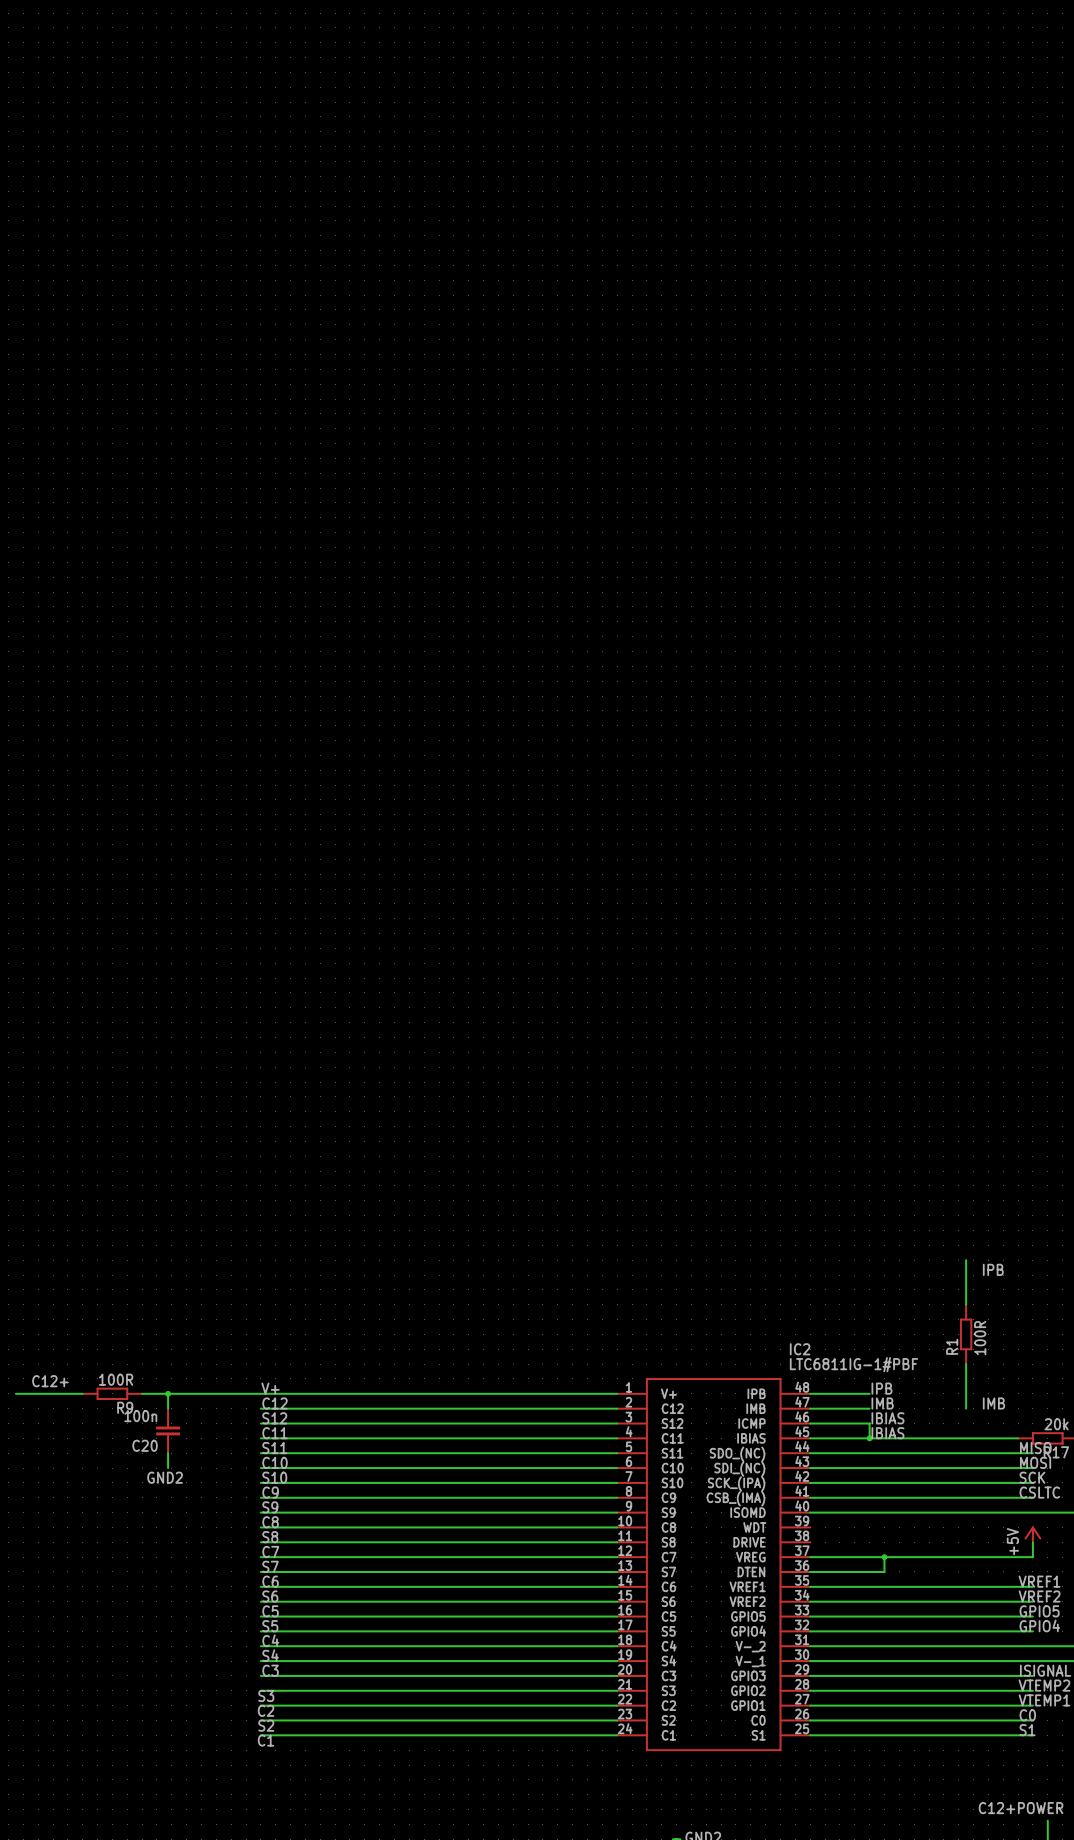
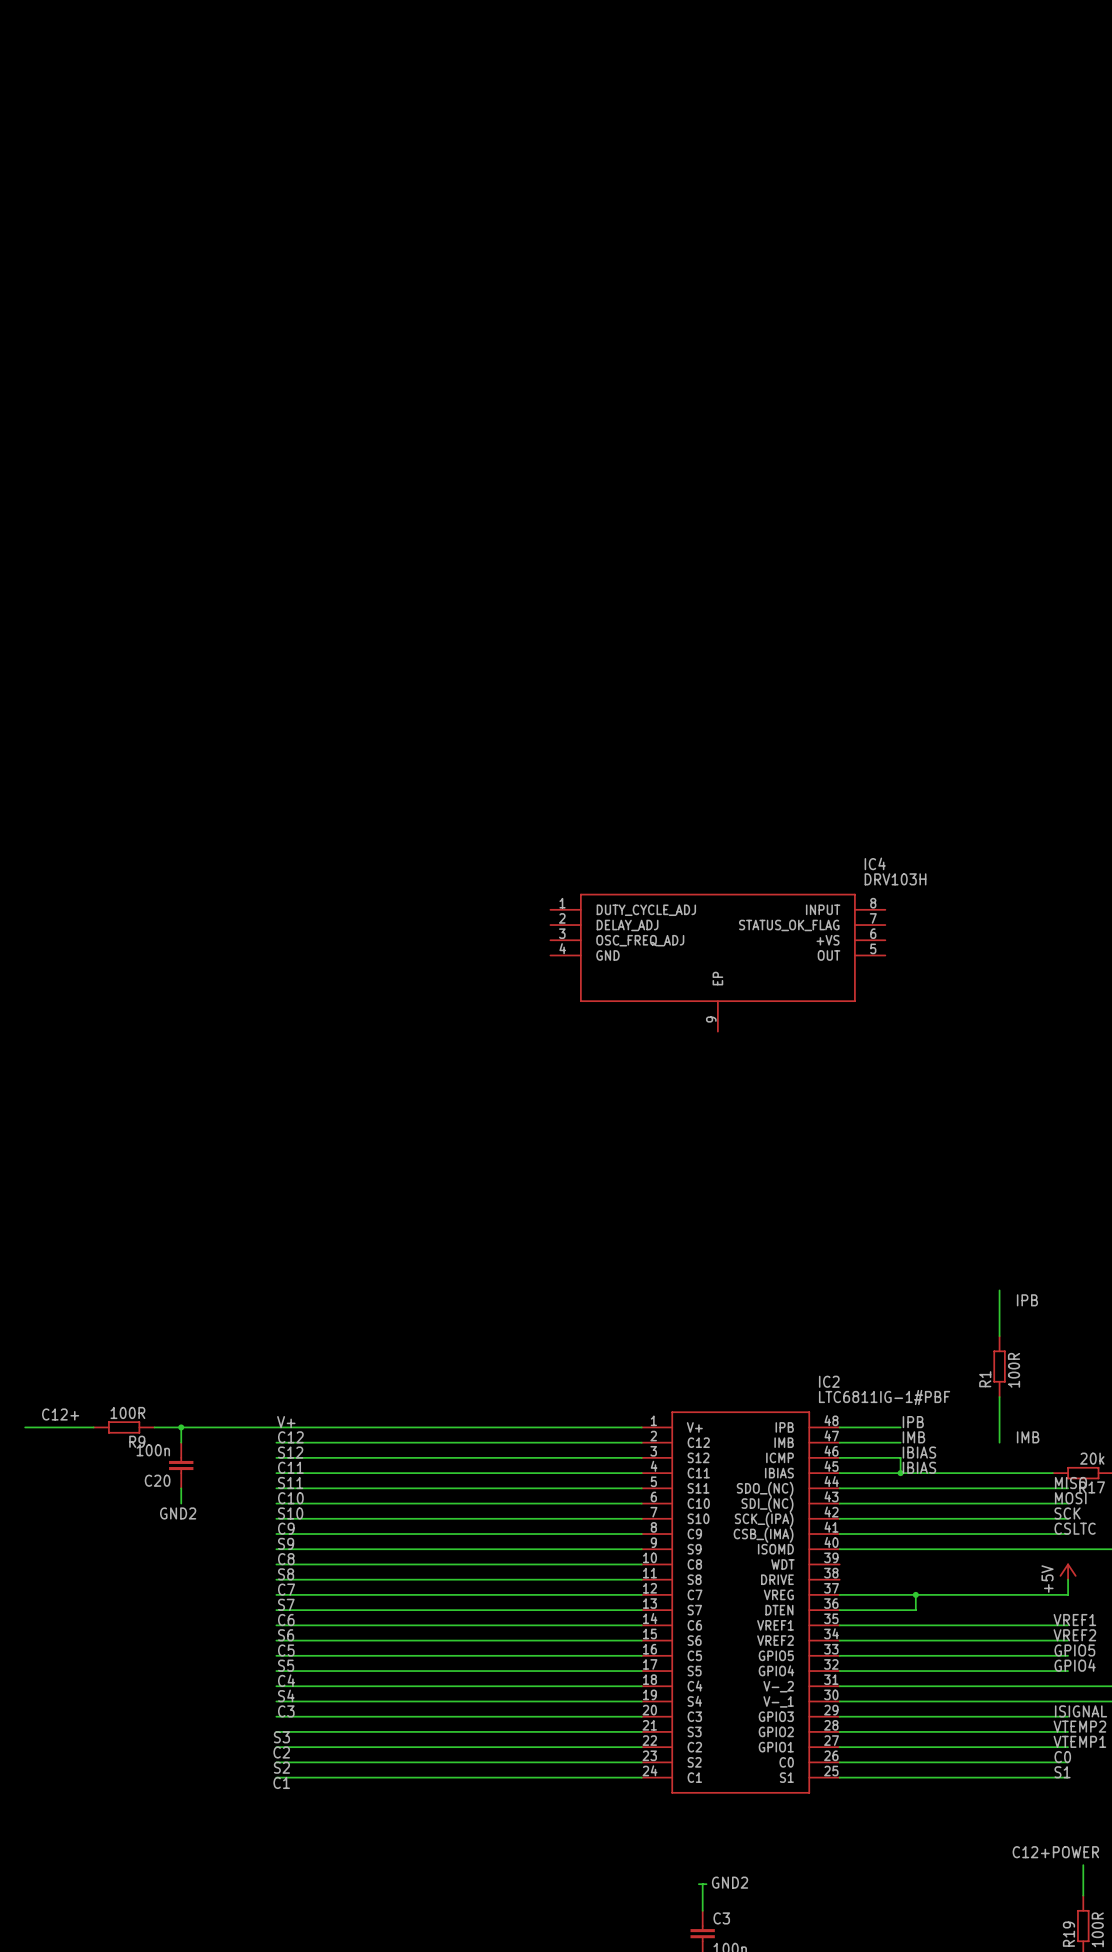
IC4: none -> DRV103H (717, 962)

